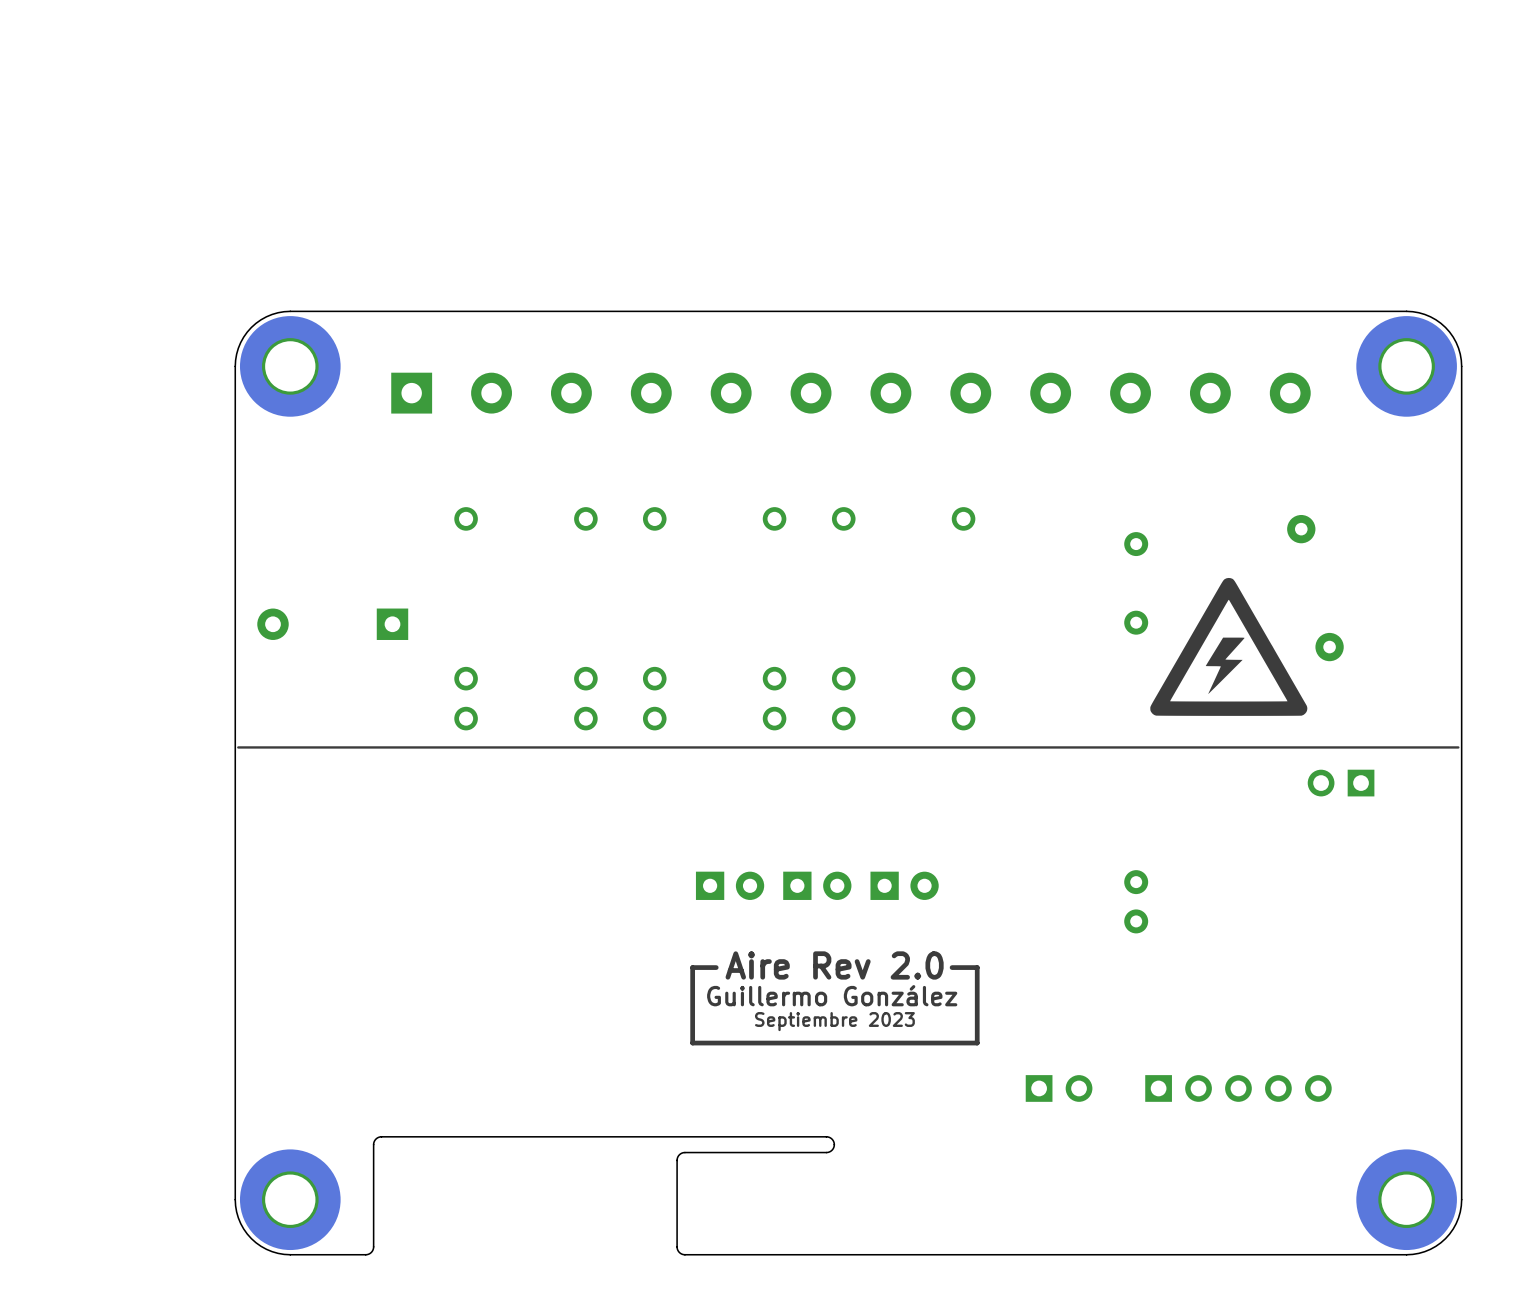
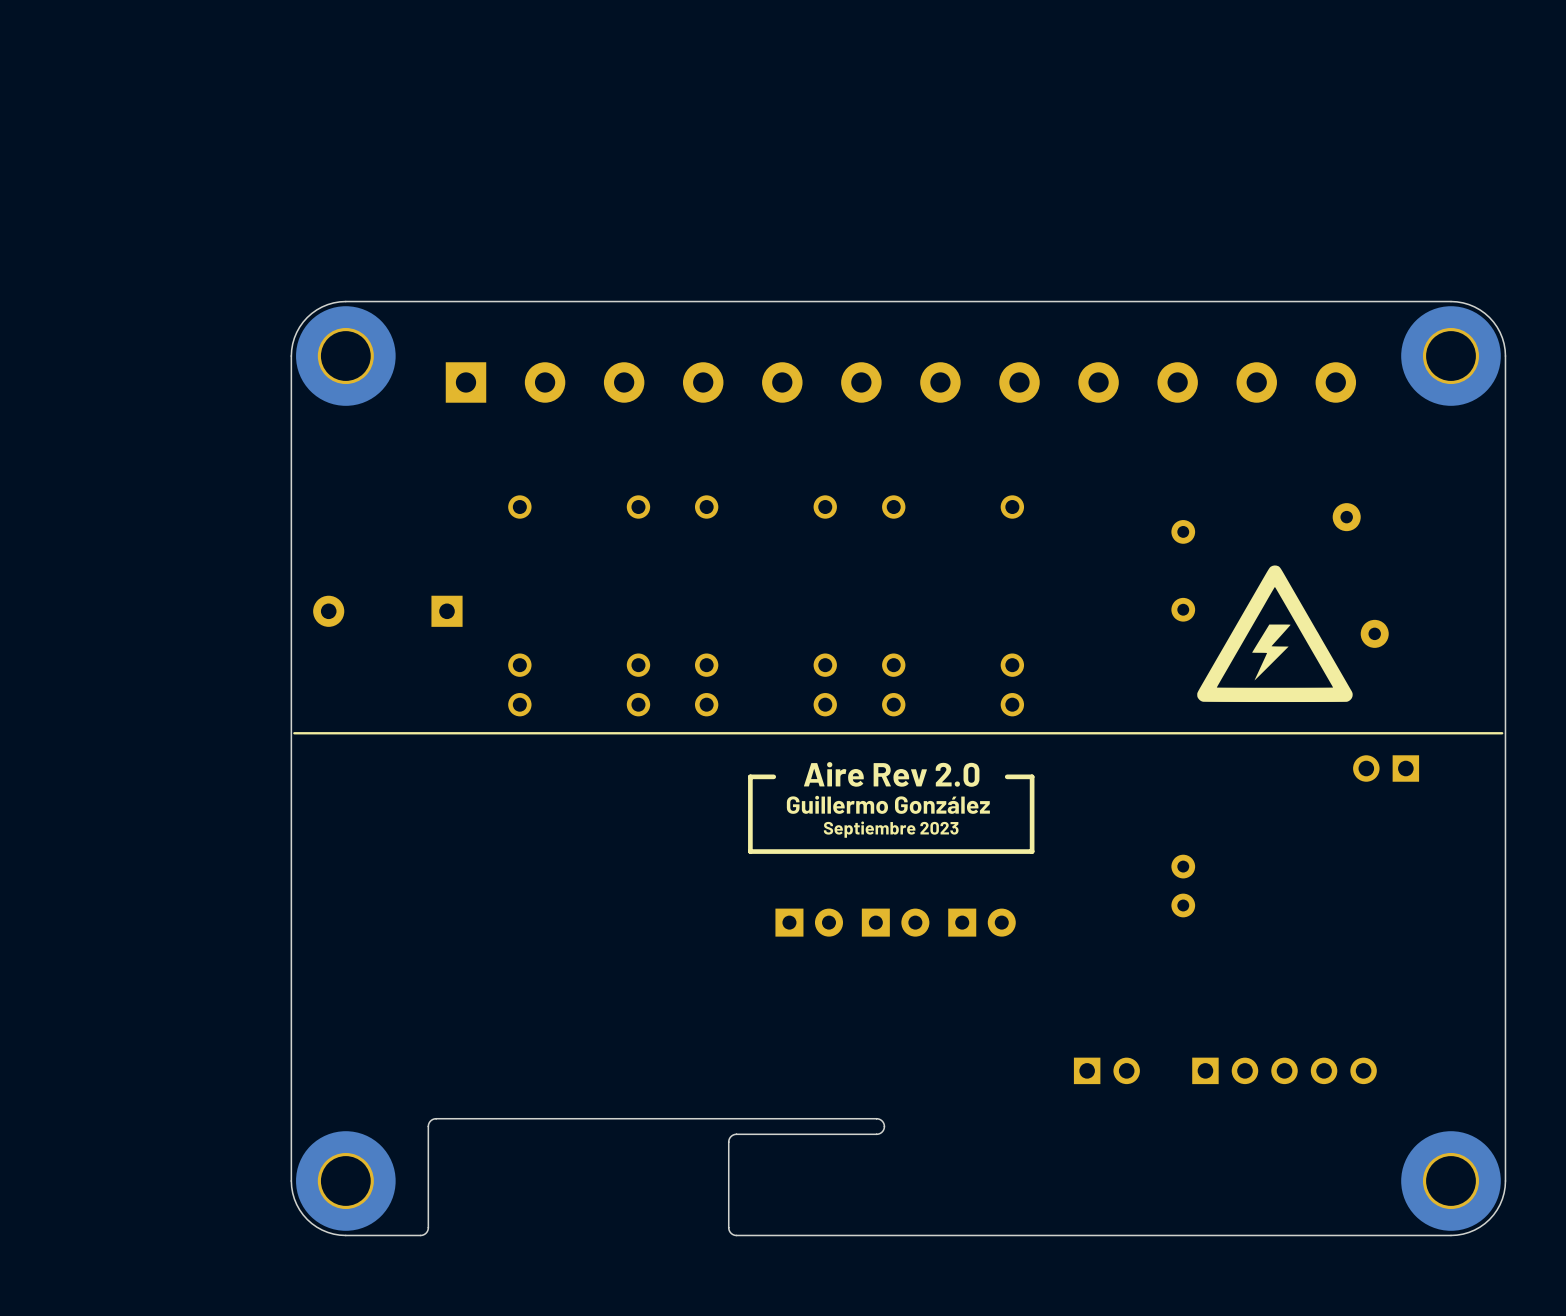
part: (730, 885) -> none
part: (817, 885) -> none
part: (904, 885) -> none
part: none -> (809, 922)
part: none -> (895, 922)
part: none -> (982, 922)
text position: Aire Rev 2.0 (834, 965) -> Aire Rev 2.0 (891, 774)
line: (952, 967) (977, 967) (977, 1043) (692, 1043) (692, 967) (716, 967) -> (1007, 776) (1032, 776) (1032, 851) (750, 851) (750, 776) (773, 776)
text position: Guillermo González (832, 995) -> Guillermo González (888, 804)
text position: Septiembre 2023 (834, 1021) -> Septiembre 2023 (891, 829)

